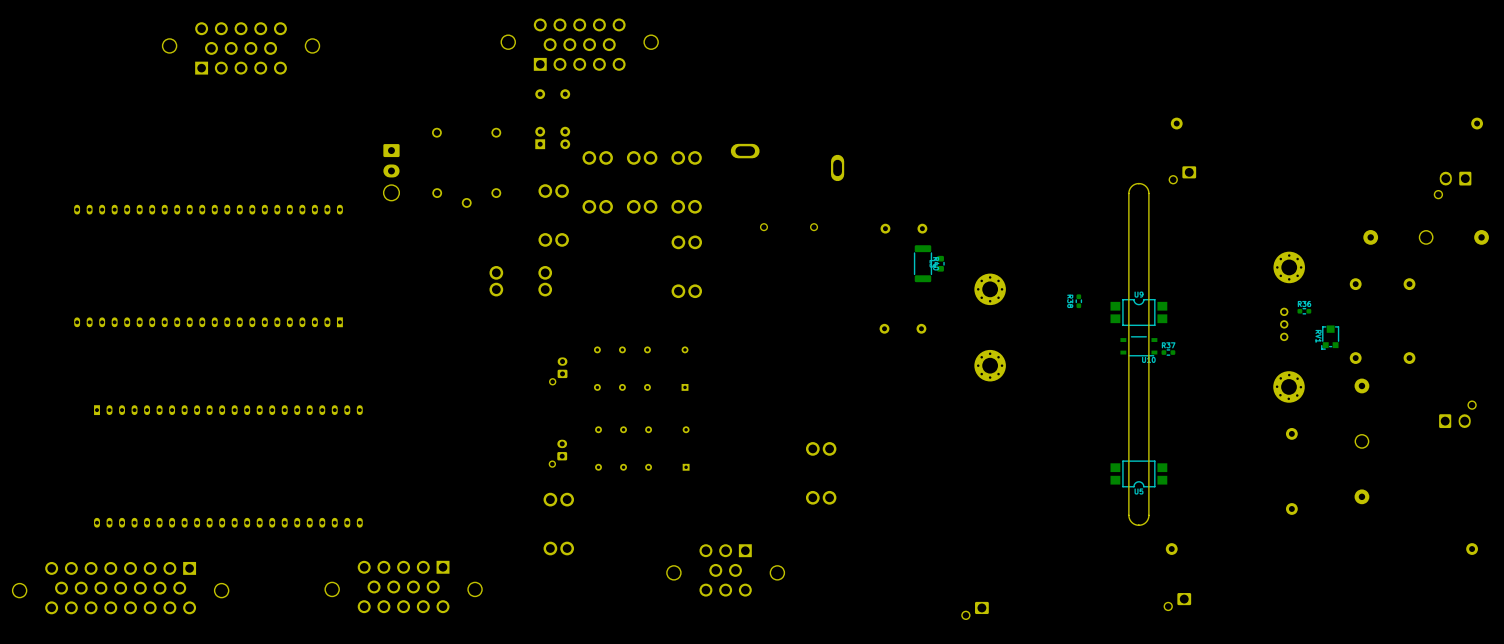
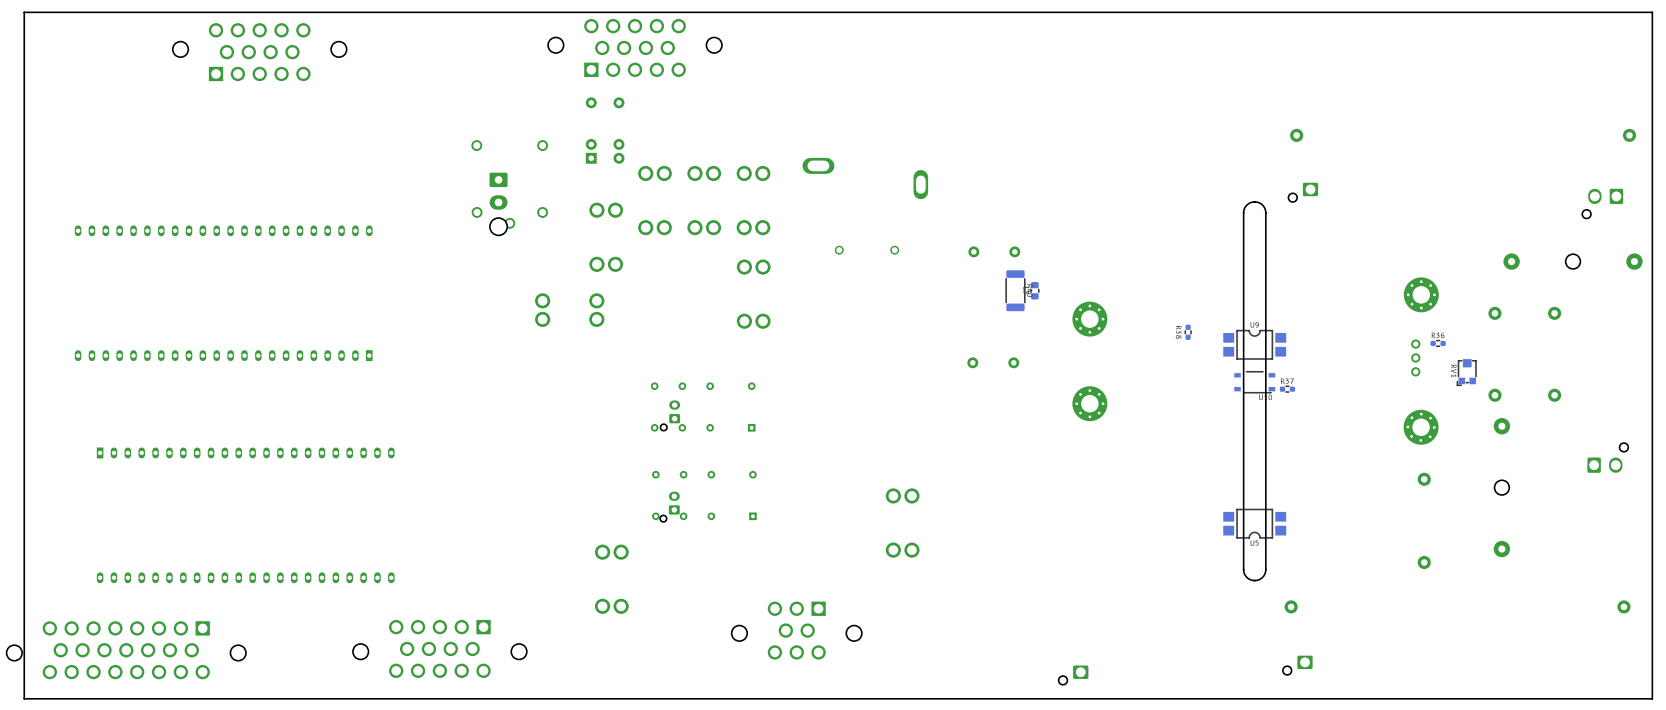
board edge: none -> (1652, 12) (24, 12) (24, 698) (1652, 698) (1652, 12)
part position: (391, 172) -> (498, 204)
part: (558, 371) -> none
part: none -> (670, 415)
part: (558, 453) -> none
part: none -> (669, 506)

